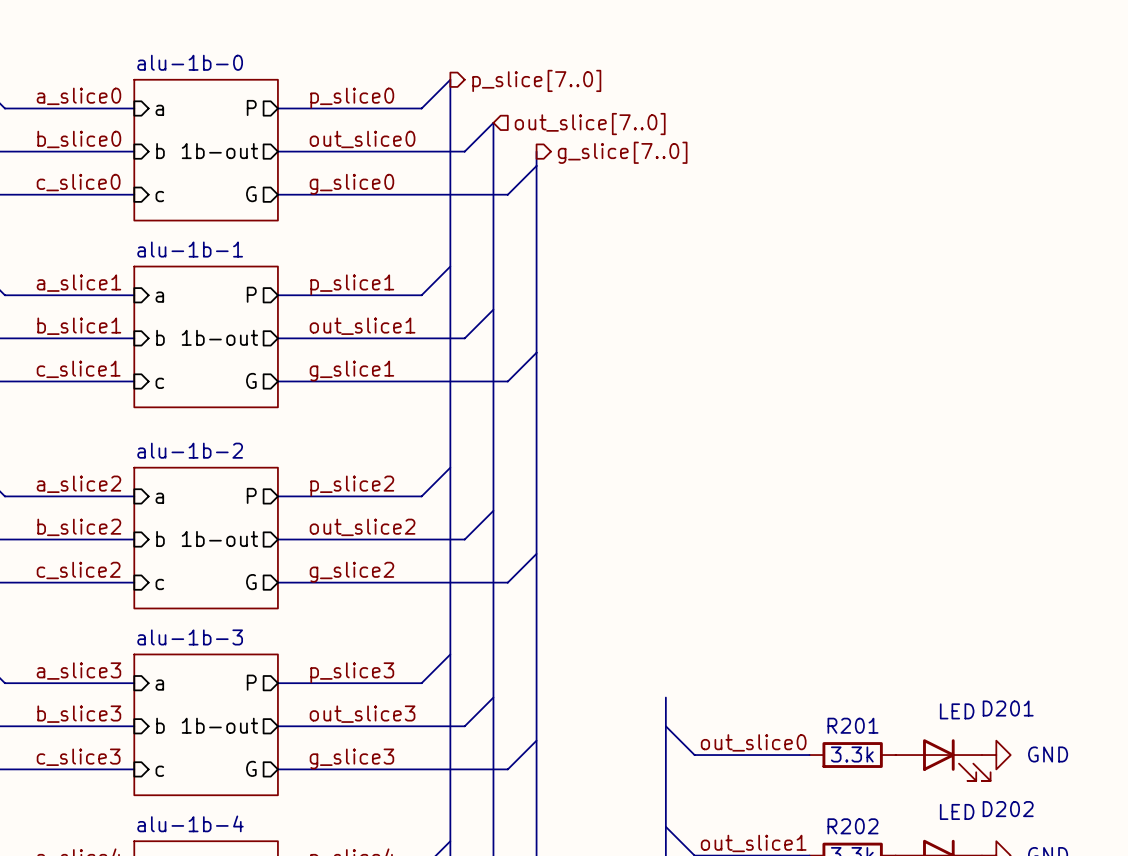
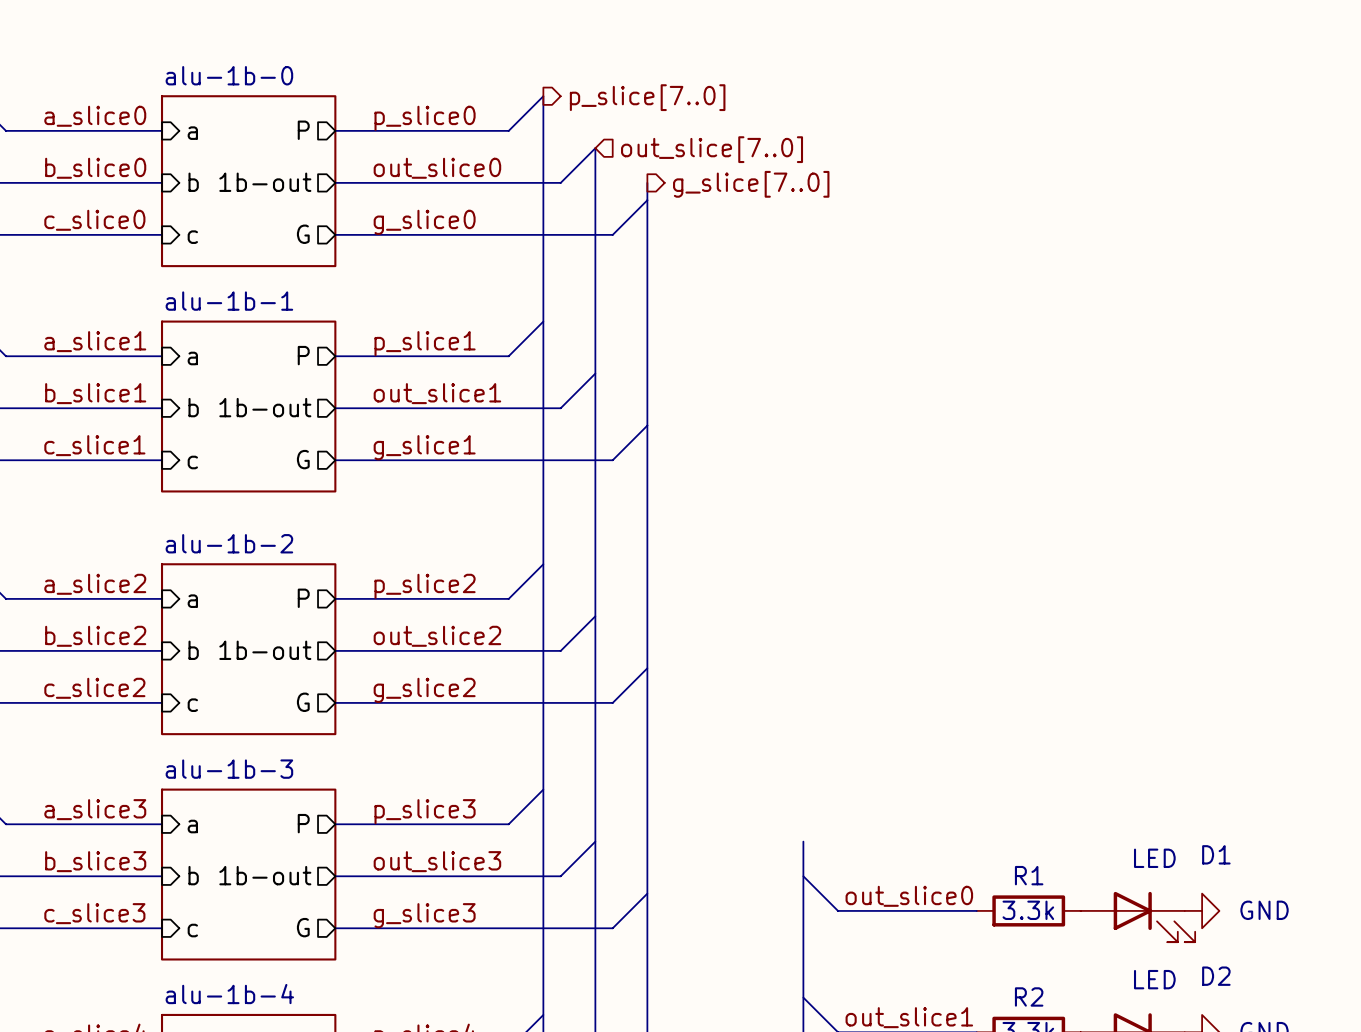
D201 name: D201 (1008, 708) -> D1 (1216, 854)
R201 name: R201 (852, 725) -> R1 (1029, 875)
D202 name: D202 (1008, 809) -> D2 (1216, 976)
R202 name: R202 (852, 826) -> R2 (1029, 996)

